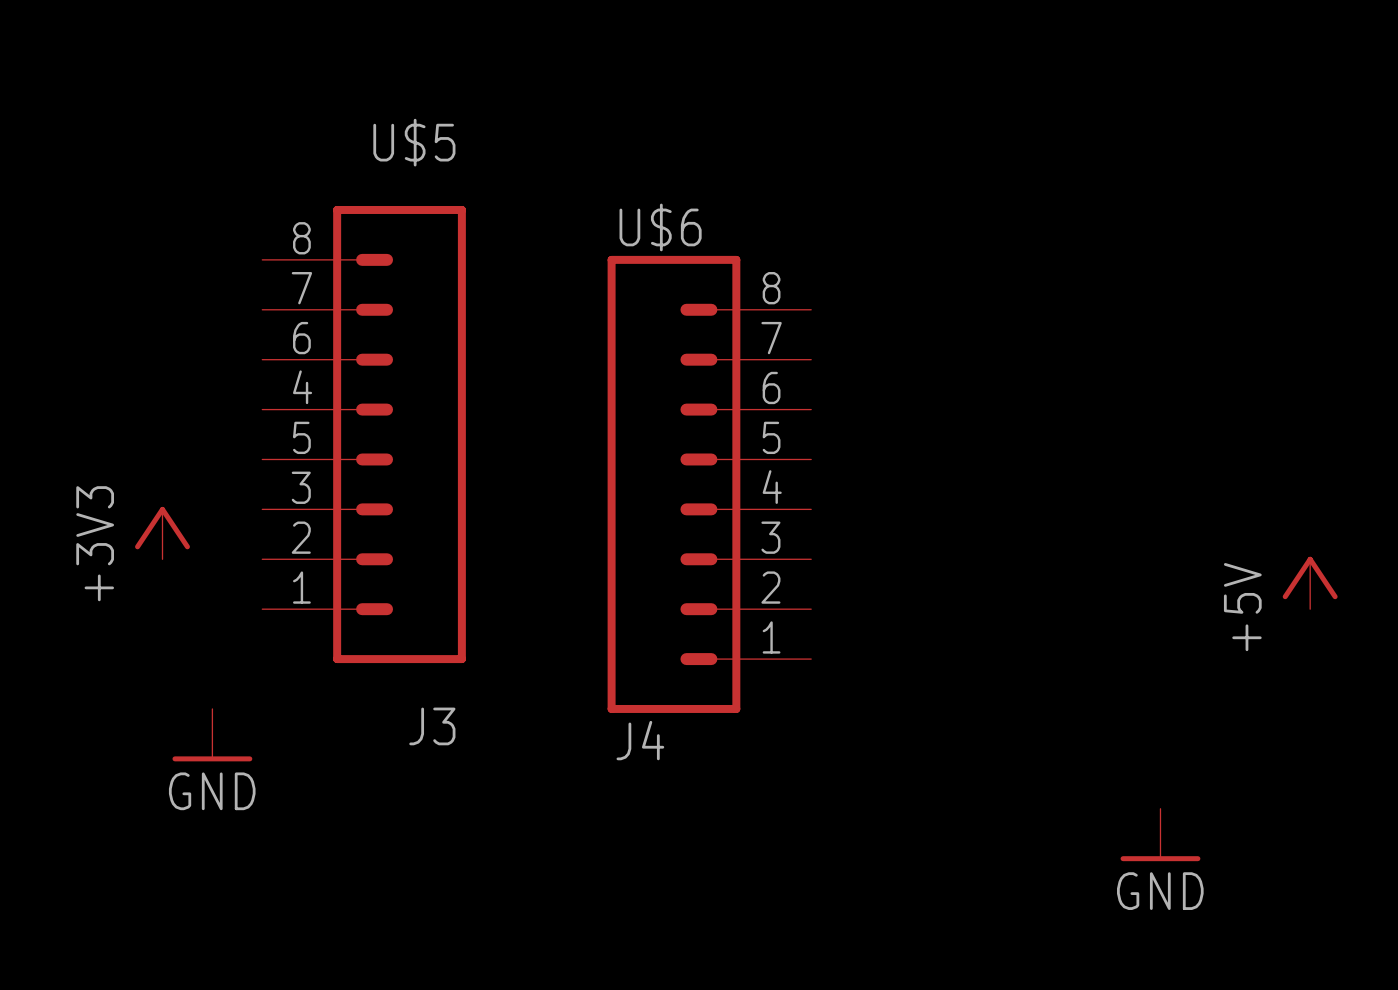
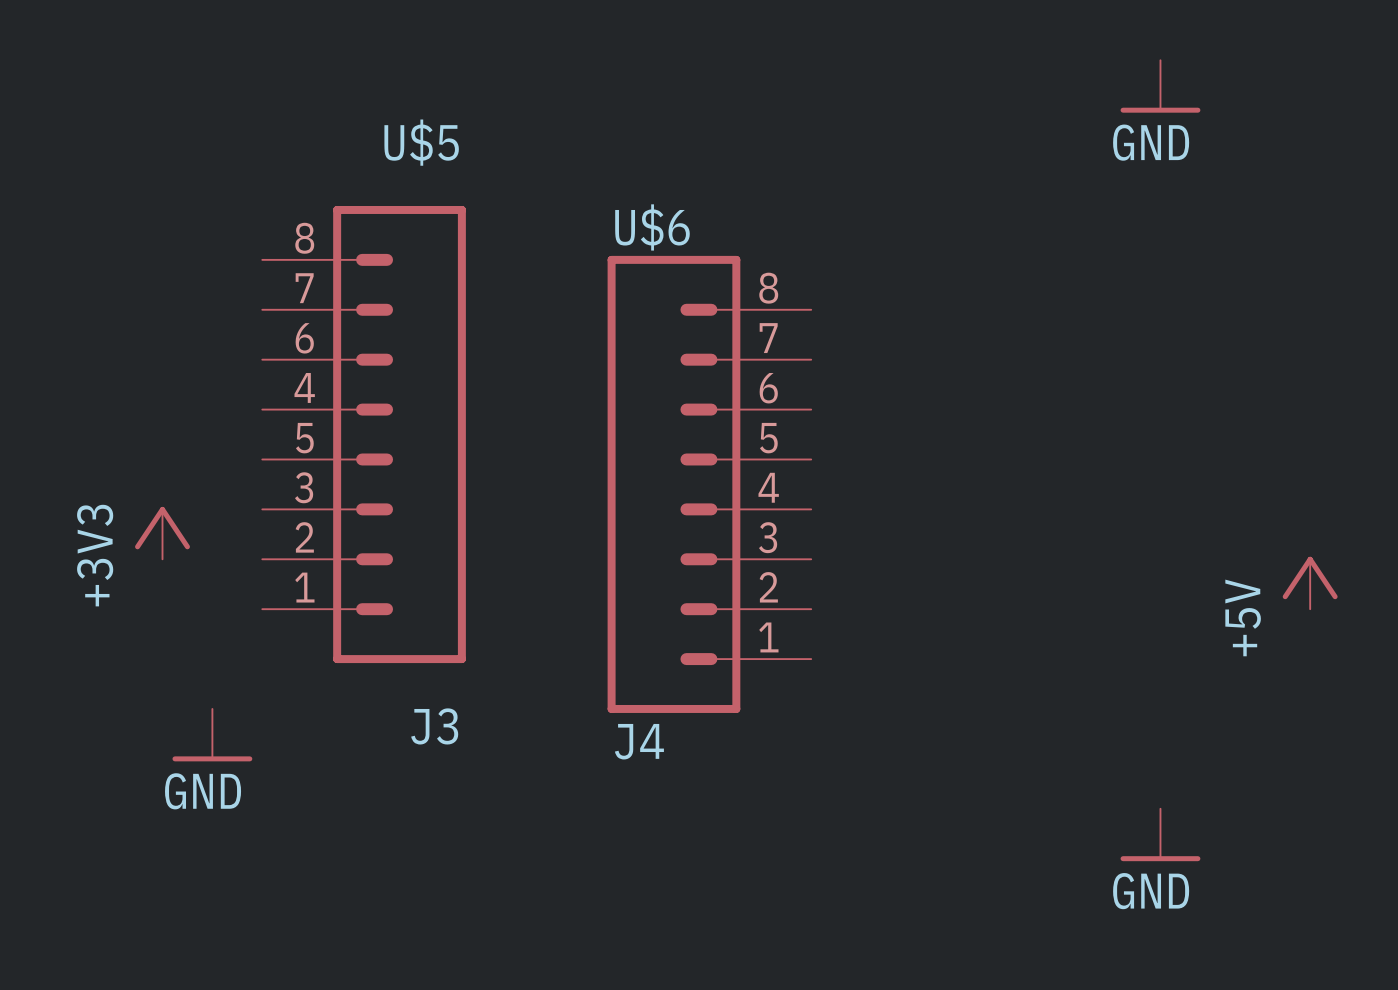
power symbol: none -> GND (1160, 86)

